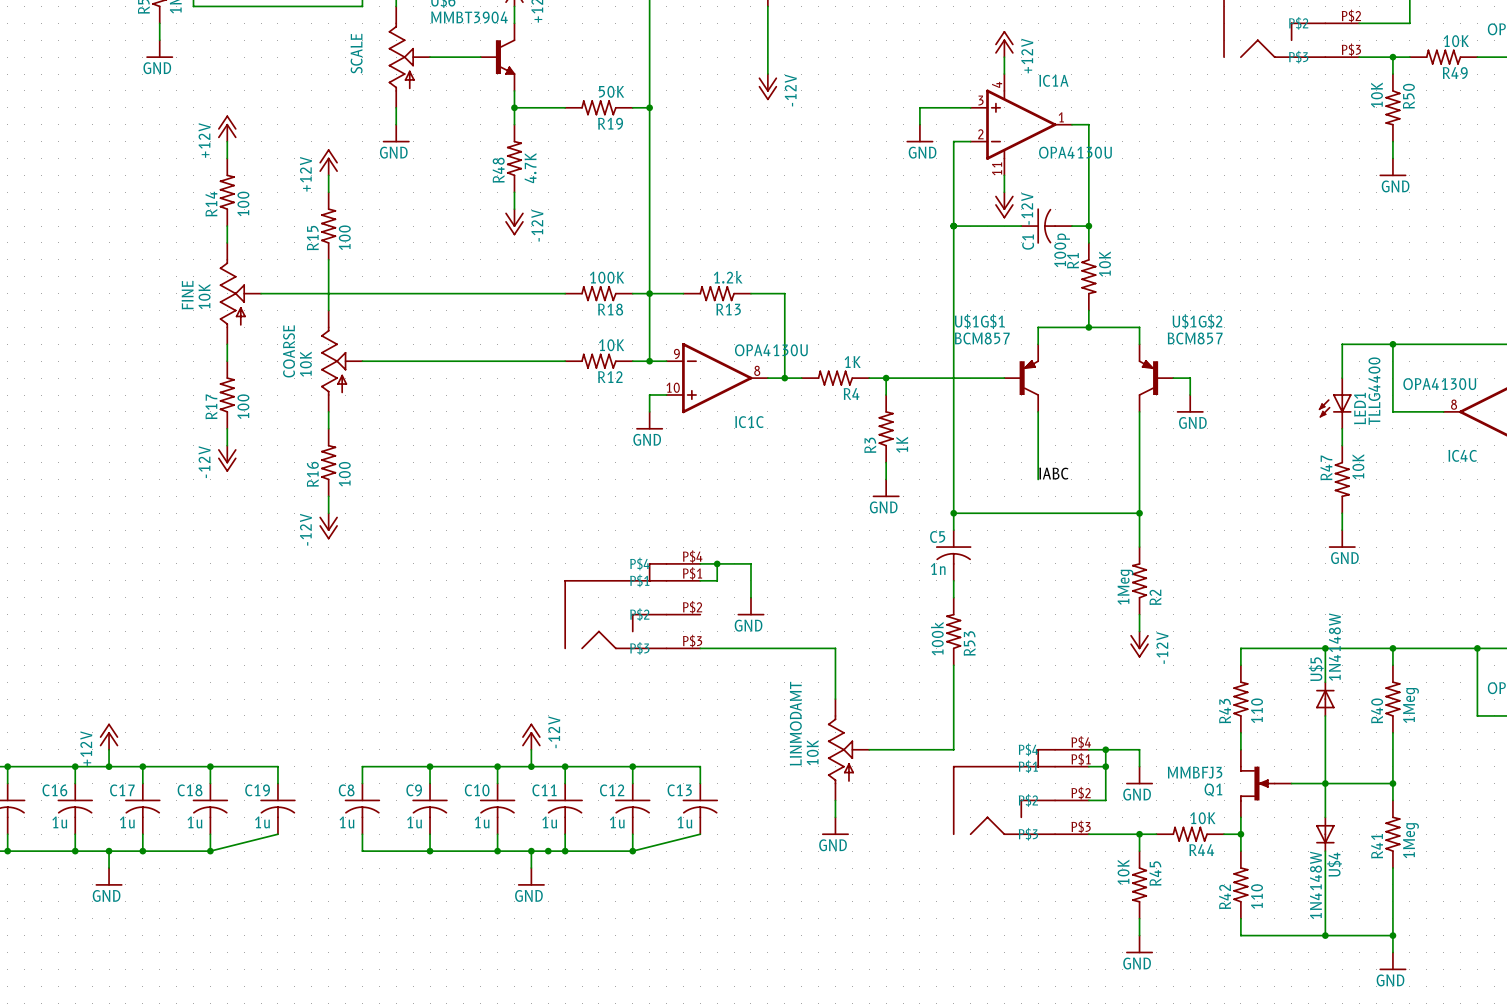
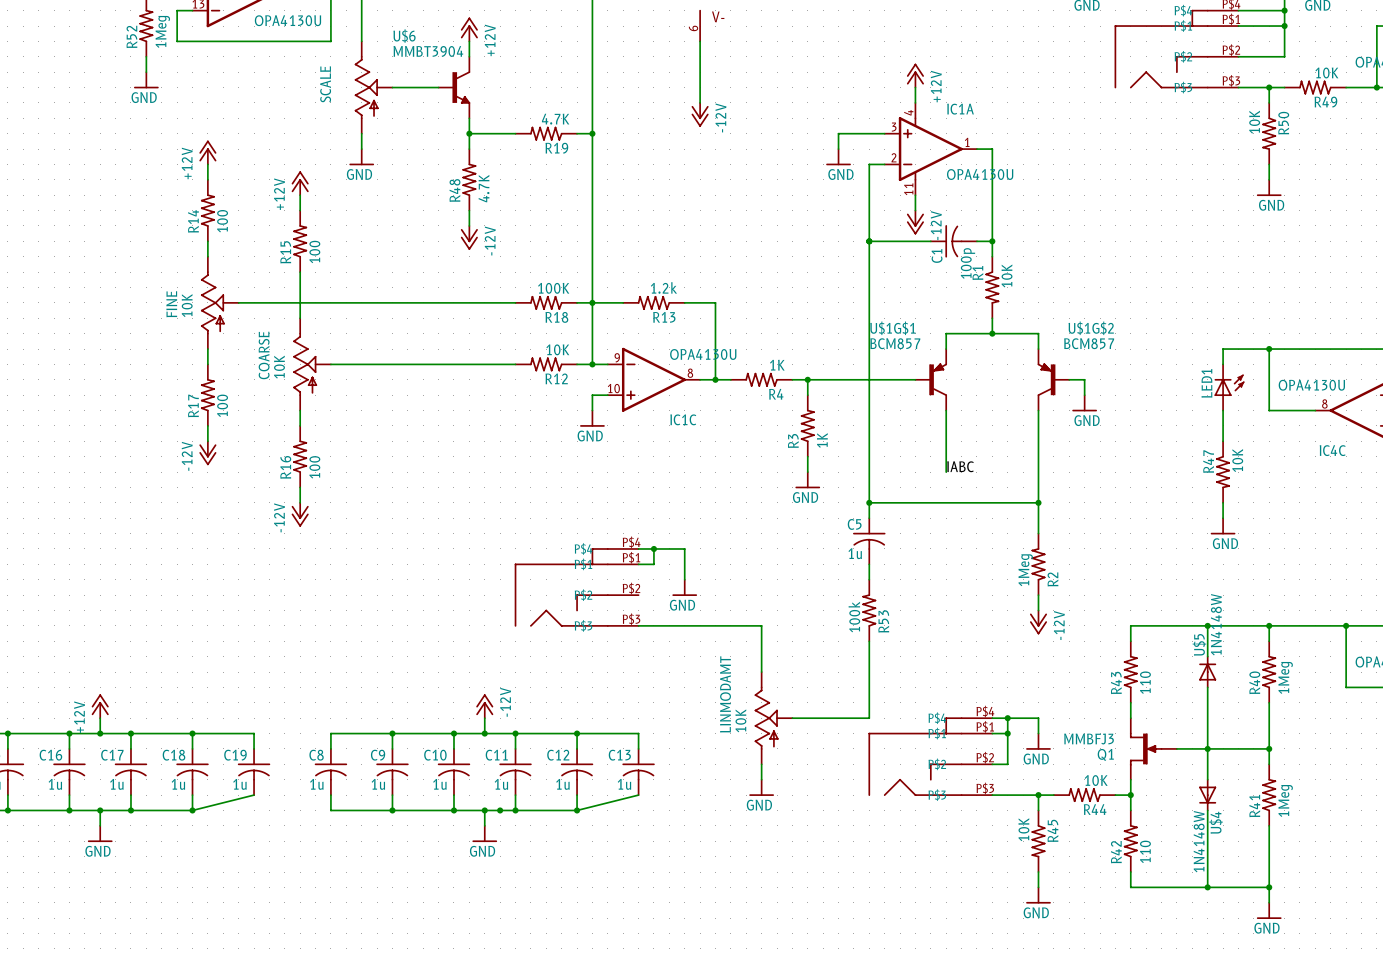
R19 value: 50K (611, 91) -> 4.7K (555, 119)
LED1 value: TLLG4400 (1374, 391) -> none
LED1 rotation: 0° (1335, 405) -> 180° (1229, 385)
C5 value: 1n (938, 569) -> 1u (855, 553)

